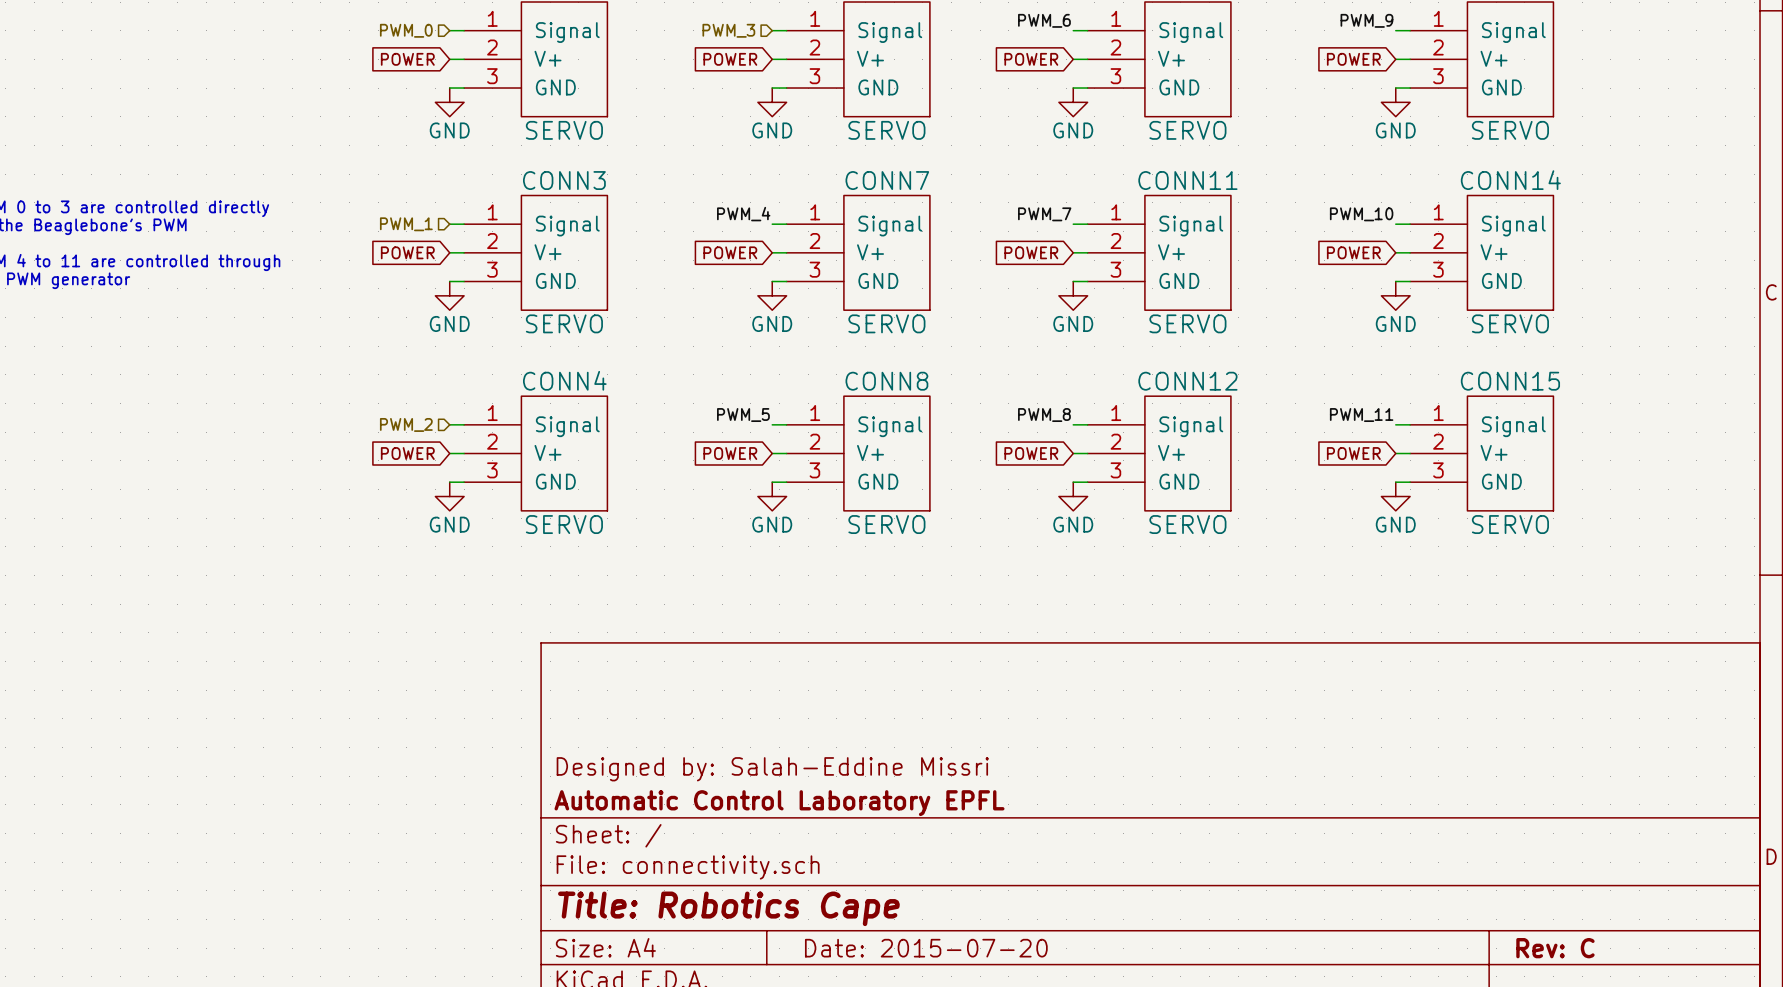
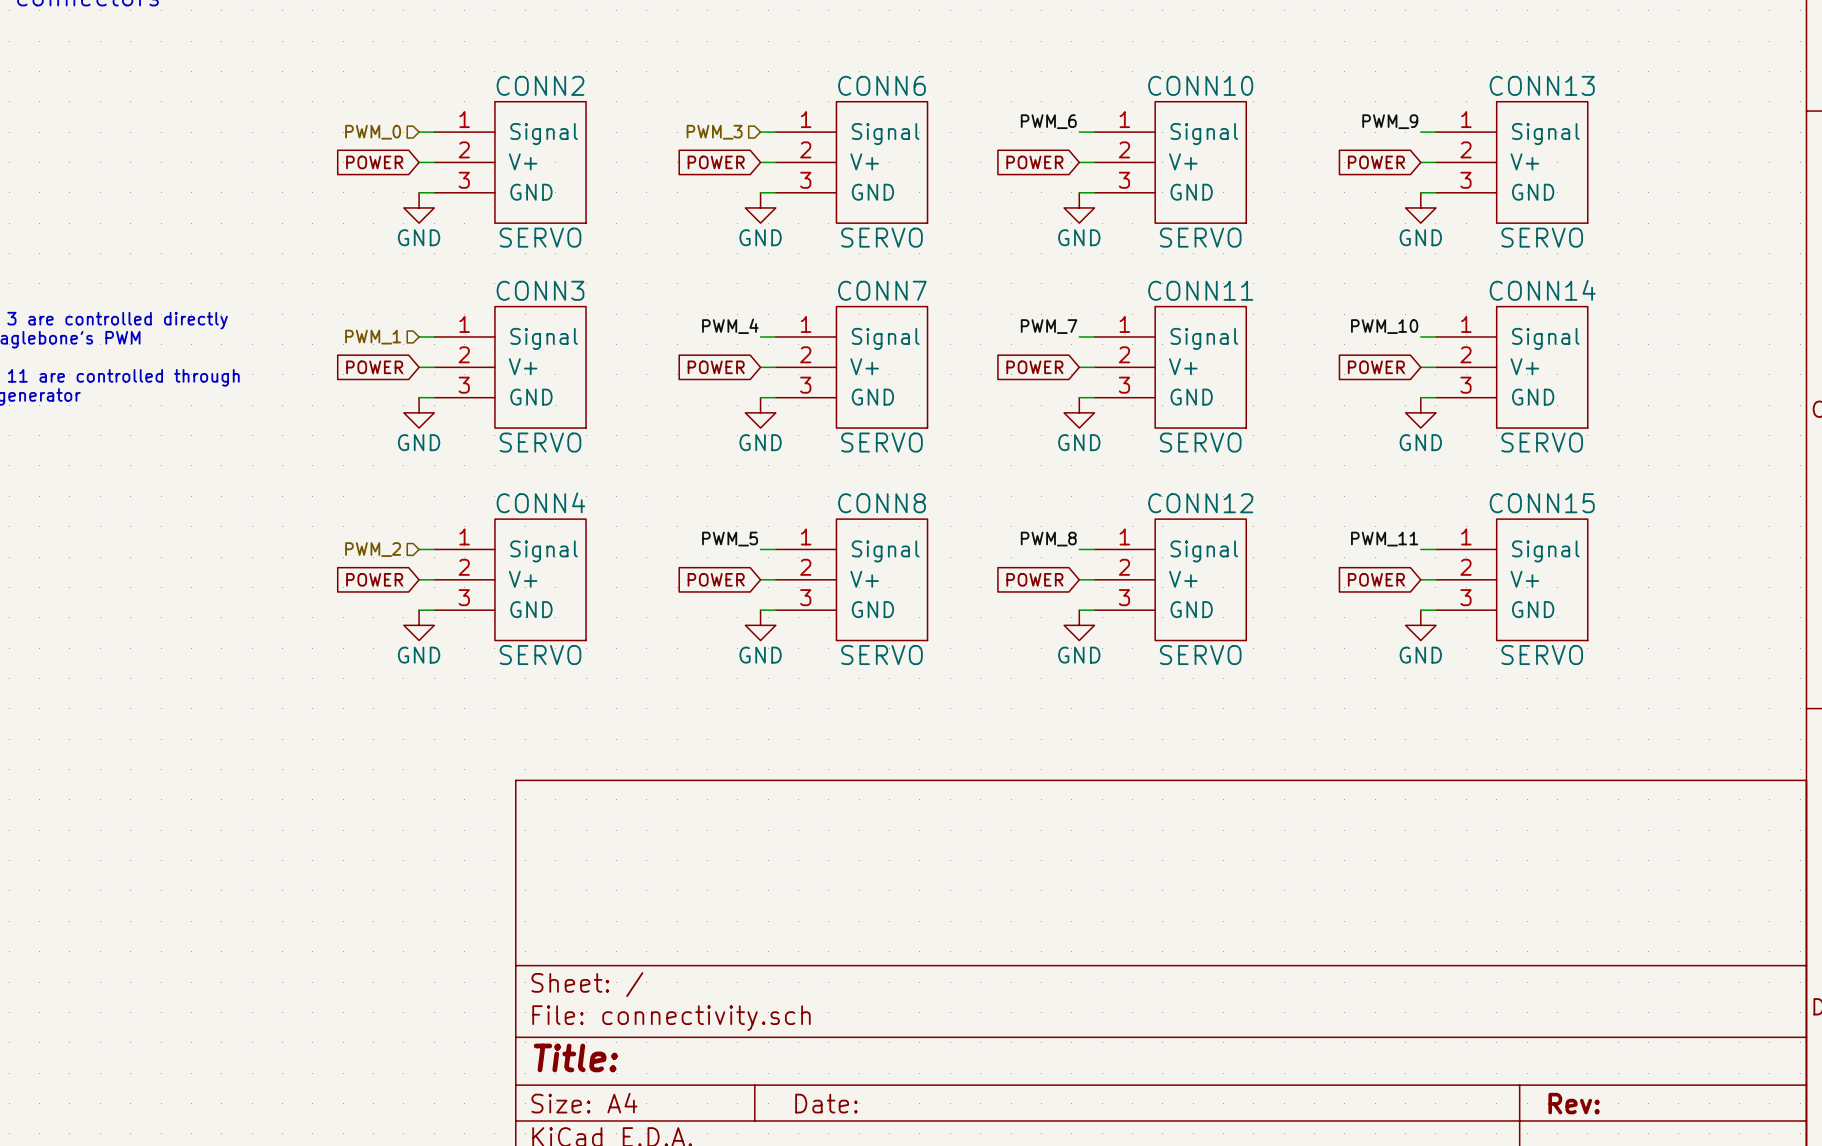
title block: Designed by: Salah-Eddine Missri (772, 769) -> none
title block: Automatic Control Laboratory EPFL (779, 803) -> none
title block: Title: Robotics Cape (728, 908) -> Title: (575, 1057)
title block: Date: 2015-07-20 (926, 948) -> Date: (826, 1103)
title block: Rev: C (1555, 948) -> Rev: (1574, 1103)

